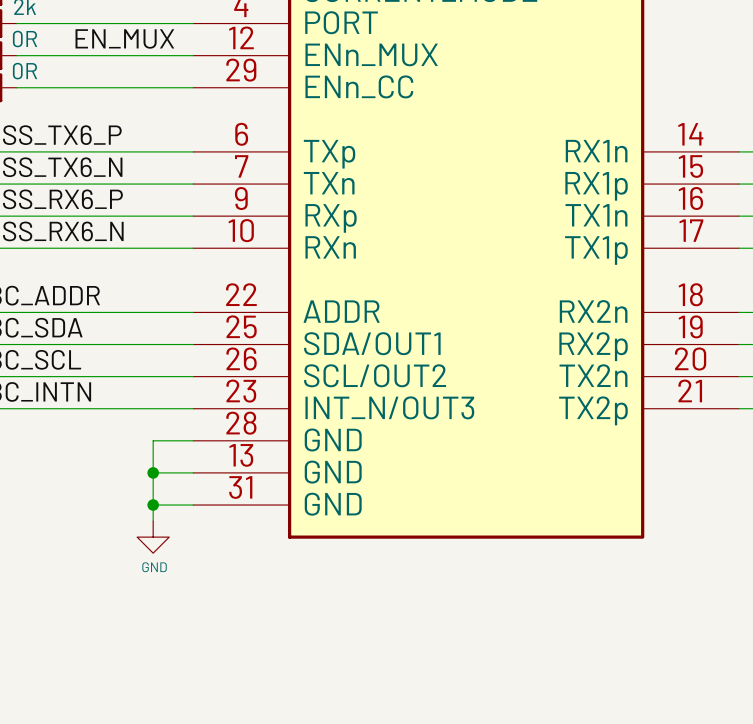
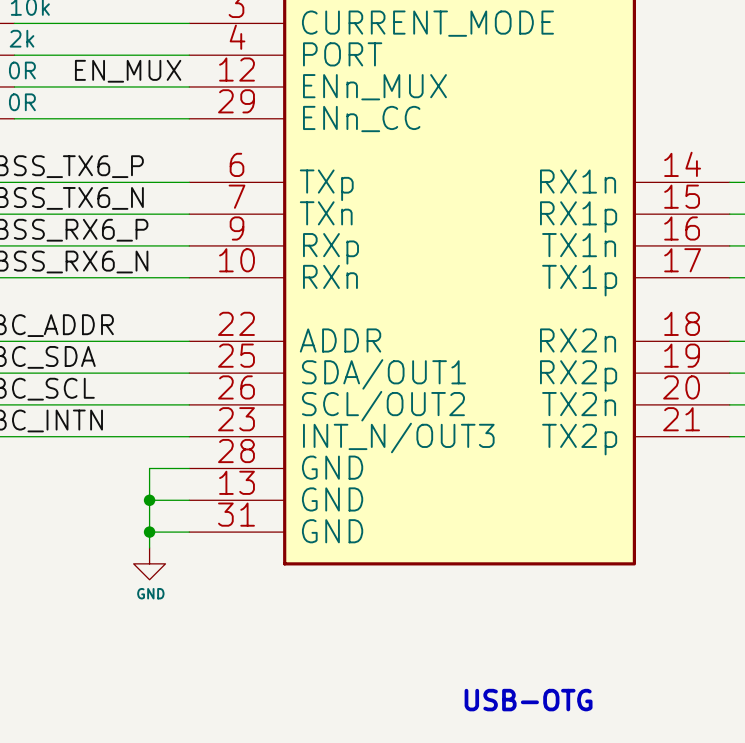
text: none -> USB-OTG (528, 700)

